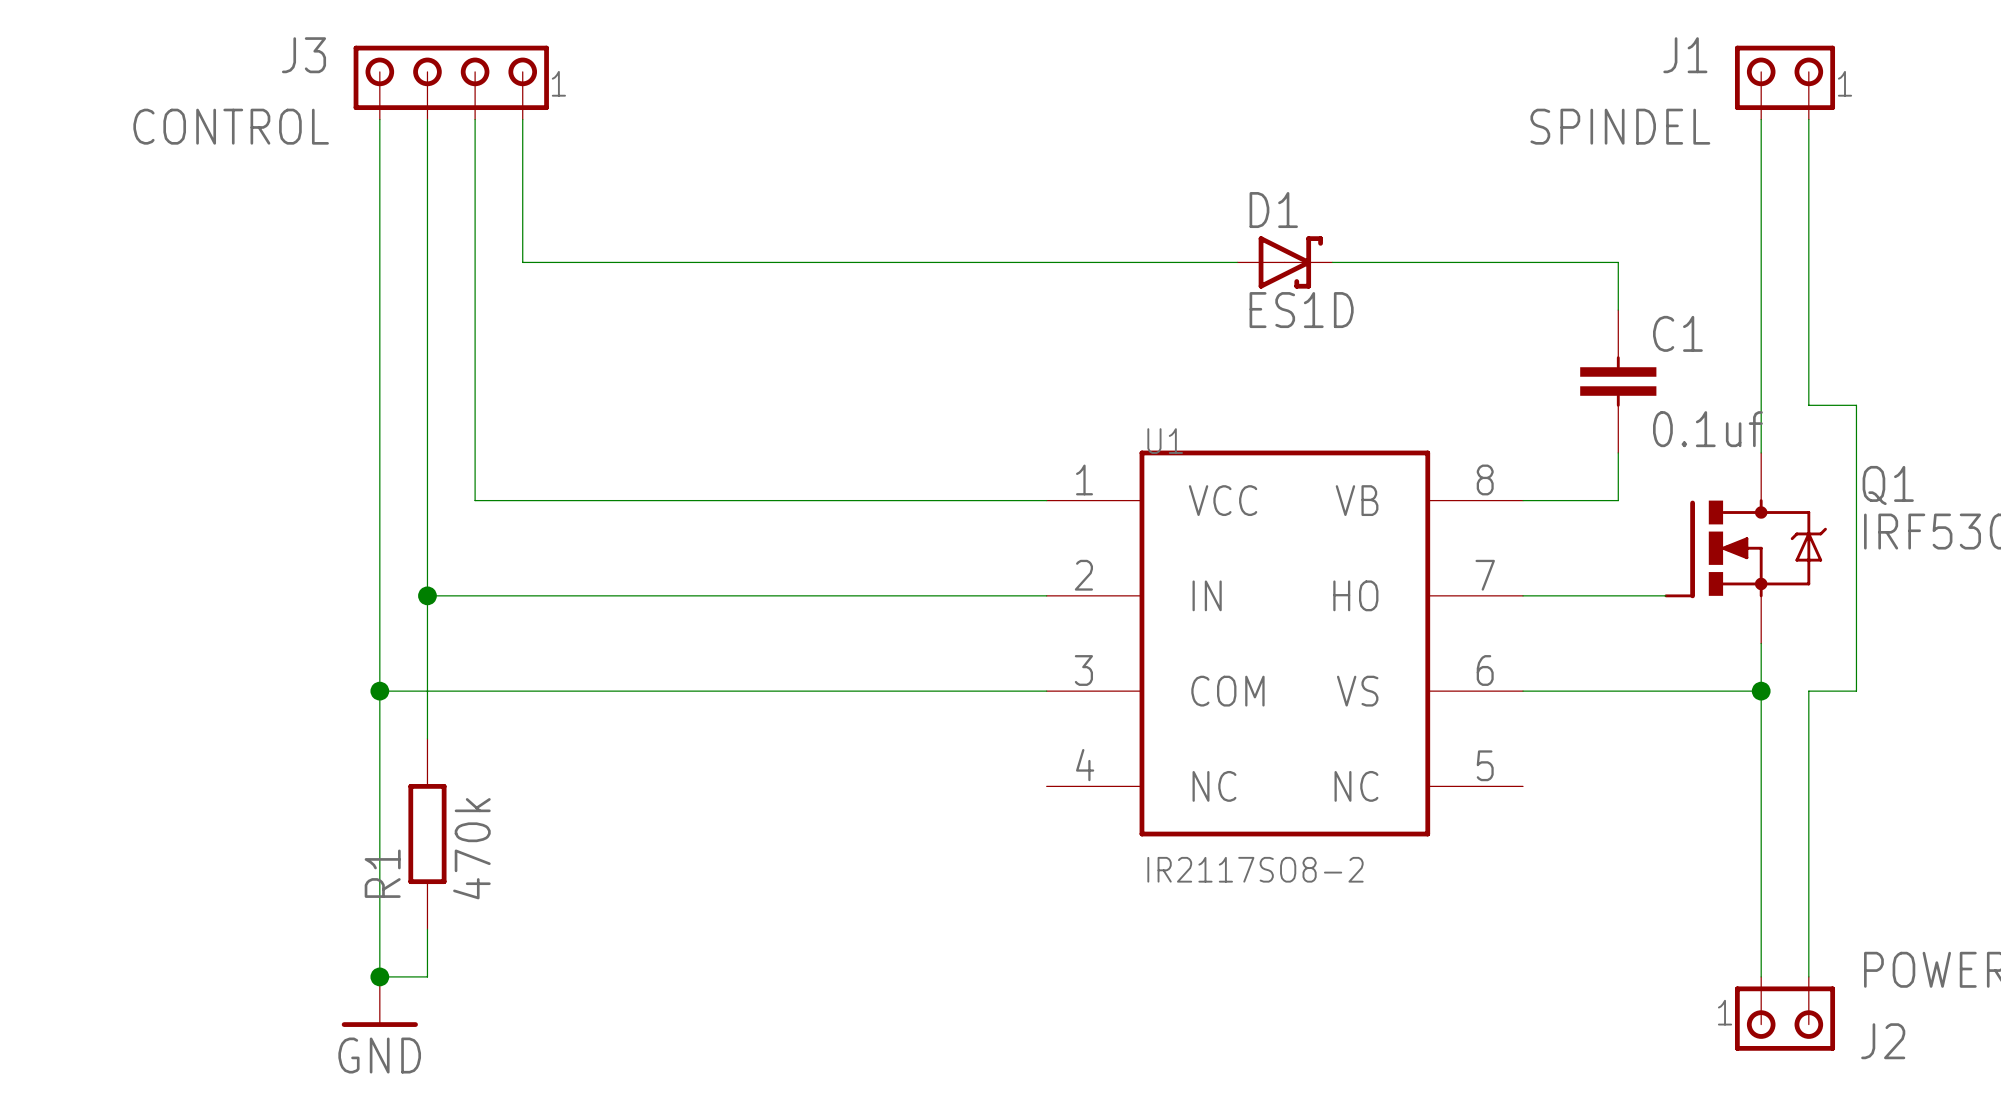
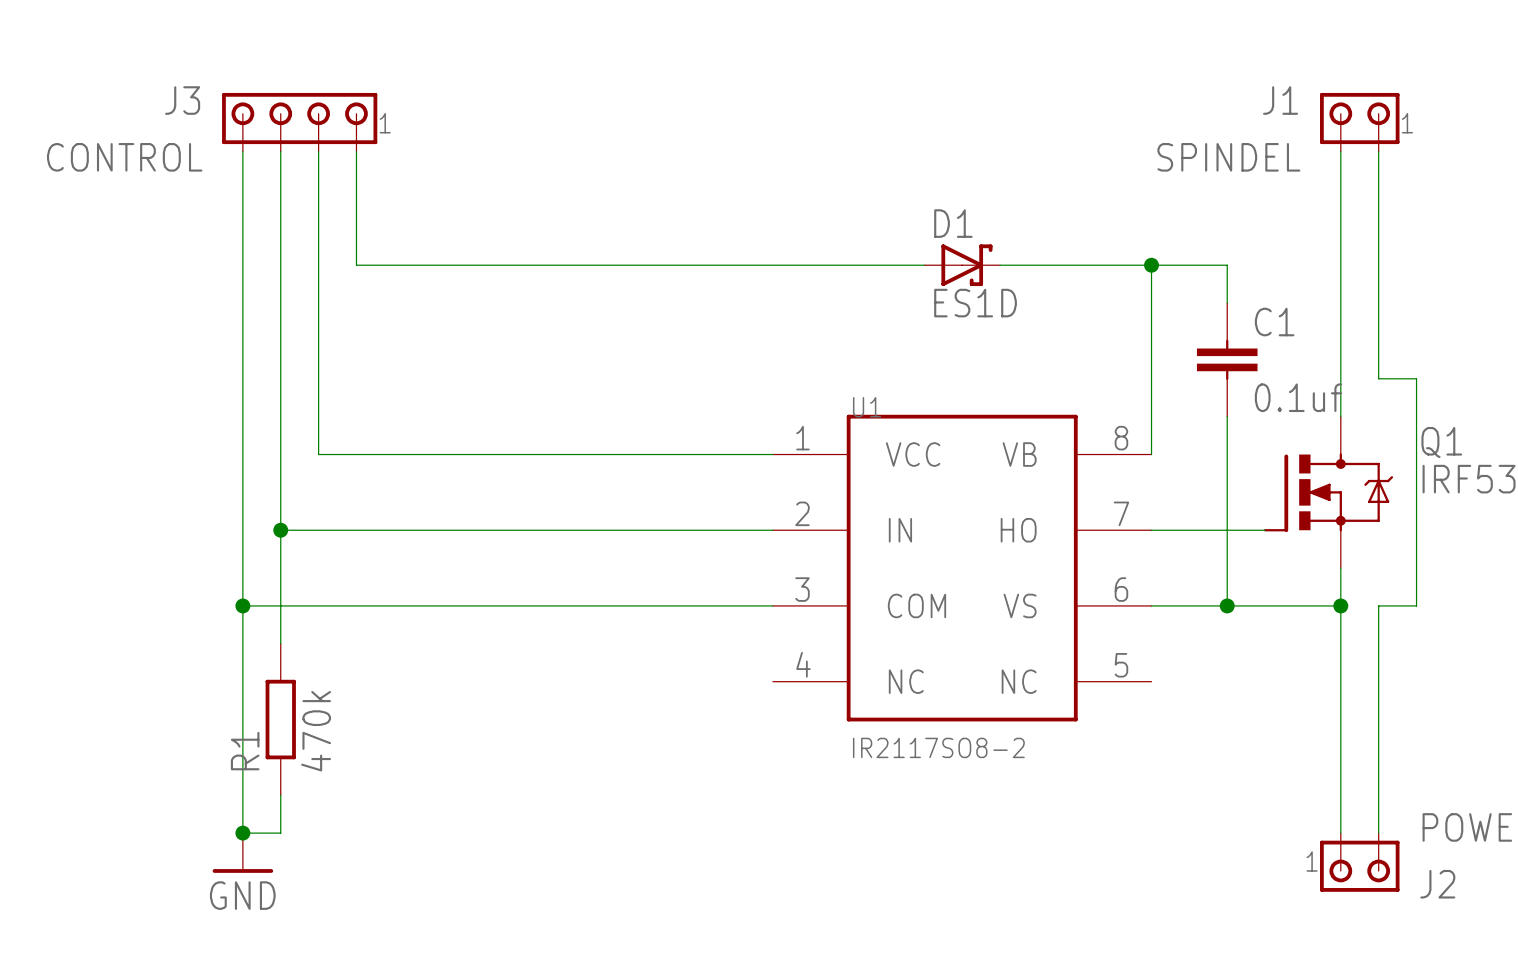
wire: none -> (1151, 265) (1151, 454)
junction: none -> (1151, 265)
wire: (1523, 500) (1618, 500) -> (1227, 605) (1227, 454)
junction: none -> (1227, 605)

